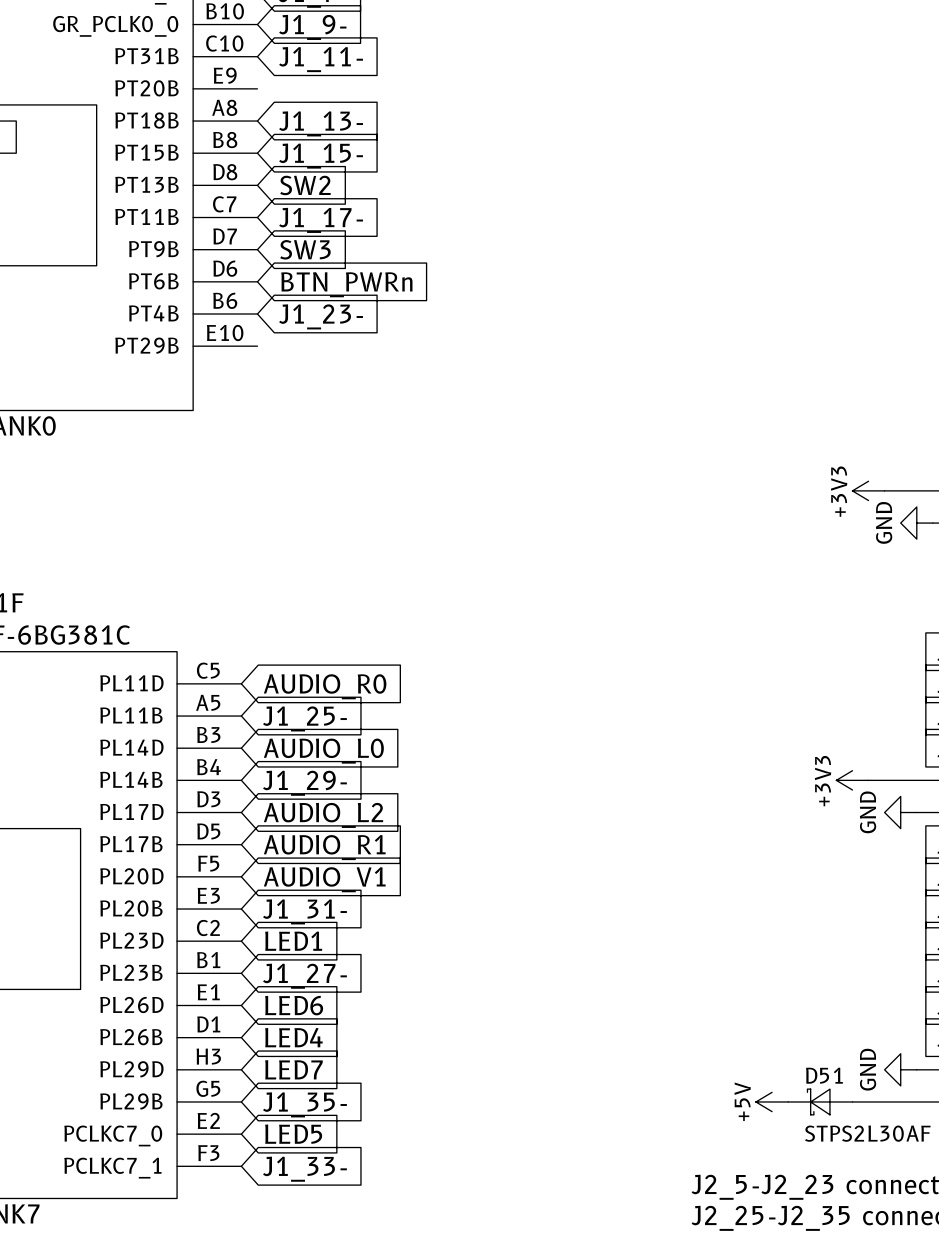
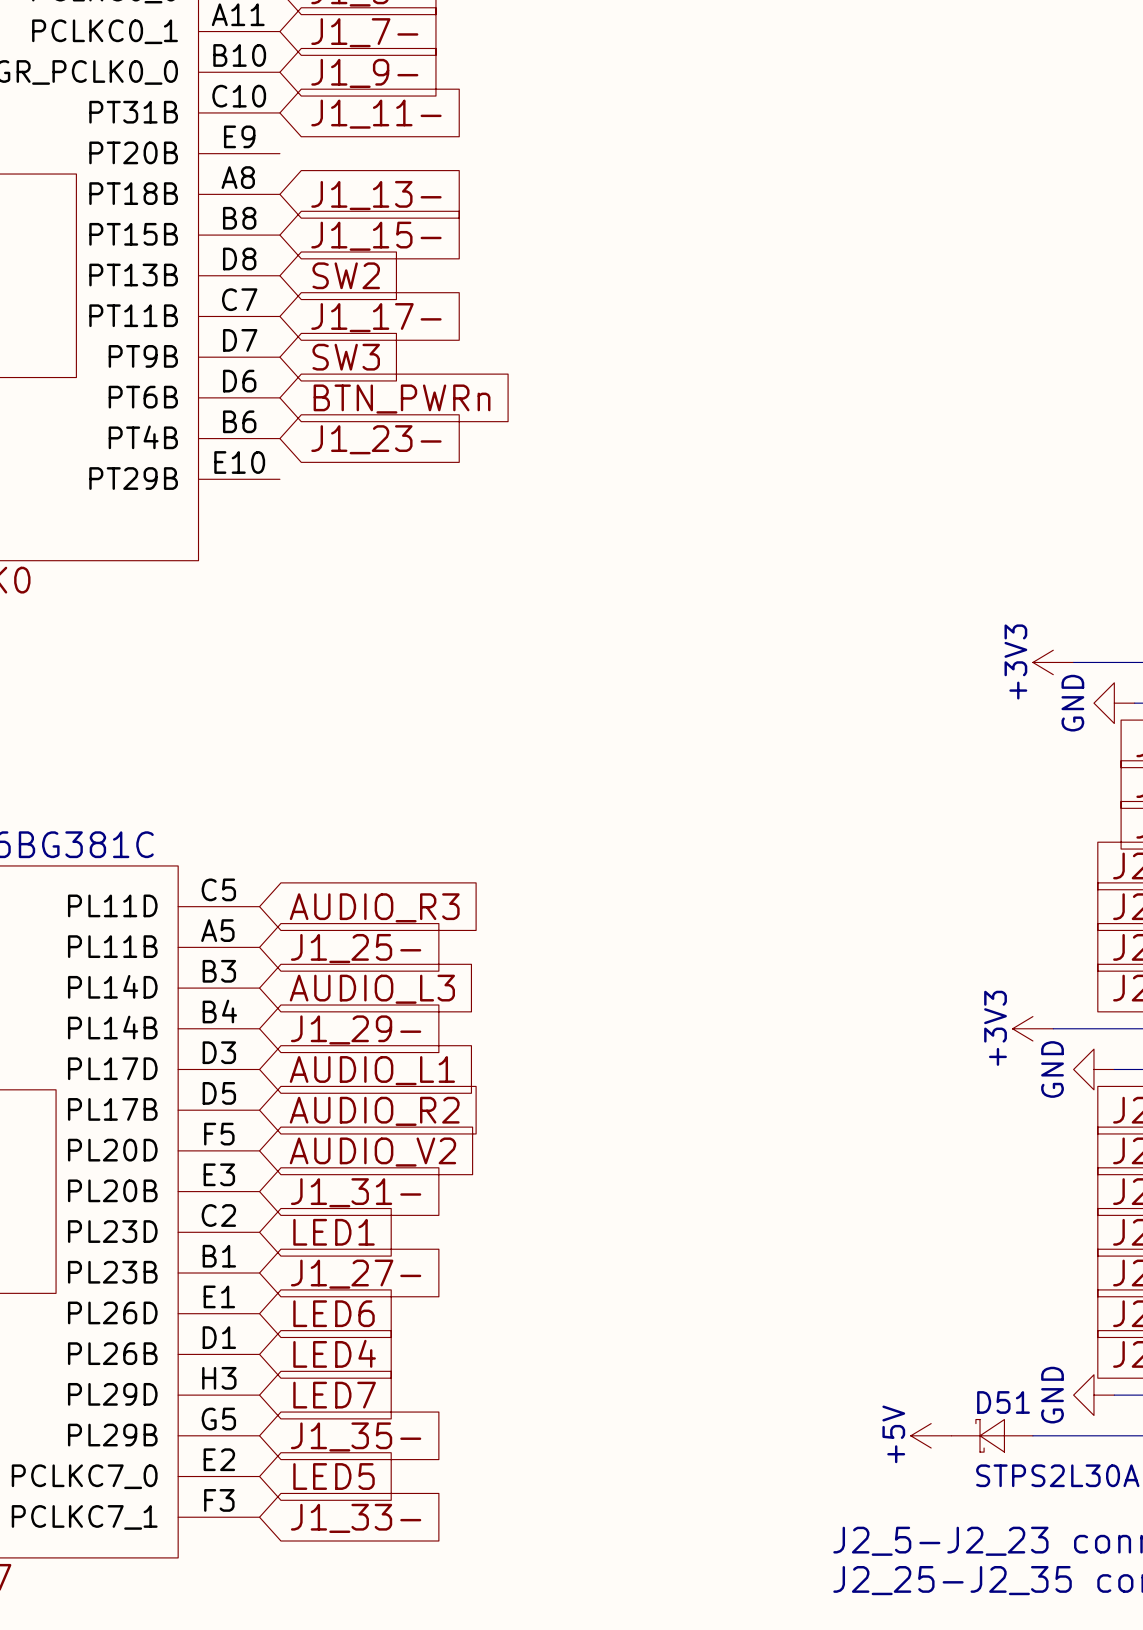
global label: AUDIO_R0 (325, 686) -> AUDIO_R3 (374, 907)
global label: AUDIO_L0 (323, 751) -> AUDIO_L3 (372, 989)
global label: AUDIO_L2 (323, 815) -> AUDIO_L1 (372, 1070)
global label: AUDIO_R1 (324, 847) -> AUDIO_R2 (374, 1111)
global label: AUDIO_V1 (324, 879) -> AUDIO_V2 (372, 1152)

